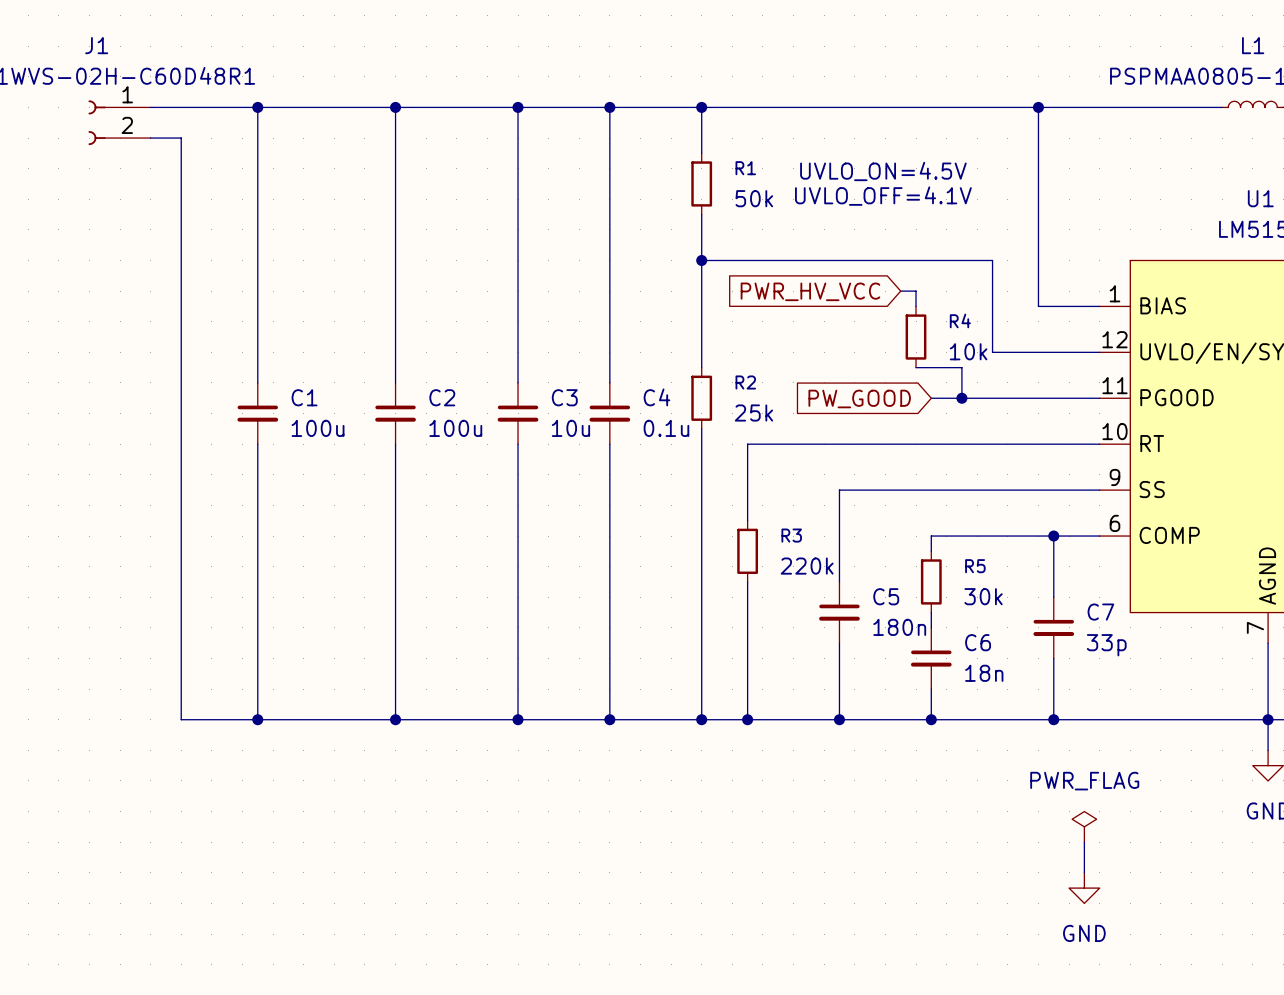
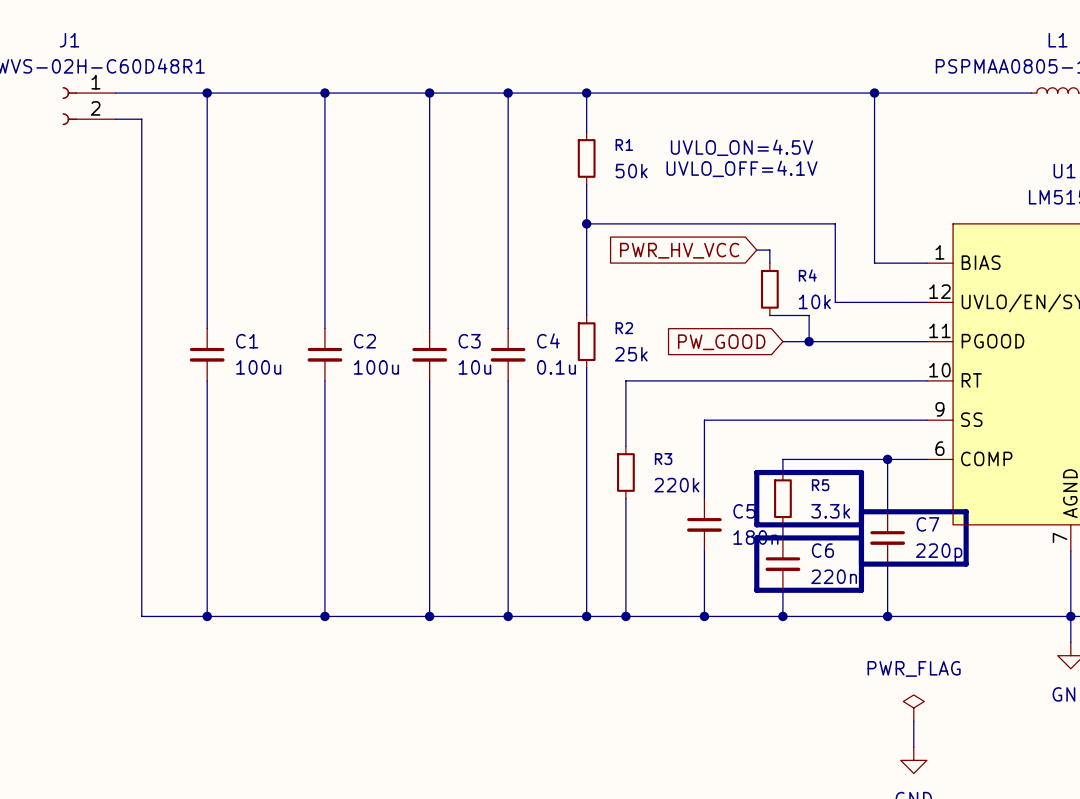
R5 value: 30k (983, 596) -> 3.3k (830, 511)
line: none -> (861, 511) (966, 511) (966, 564) (861, 564)
line: none -> (861, 524) (756, 524) (756, 472) (861, 472) (861, 590) (756, 590) (756, 537) (861, 537)
C7 value: 33p (1106, 645) -> 220p (939, 552)
C6 value: 18n (984, 673) -> 220n (834, 576)

